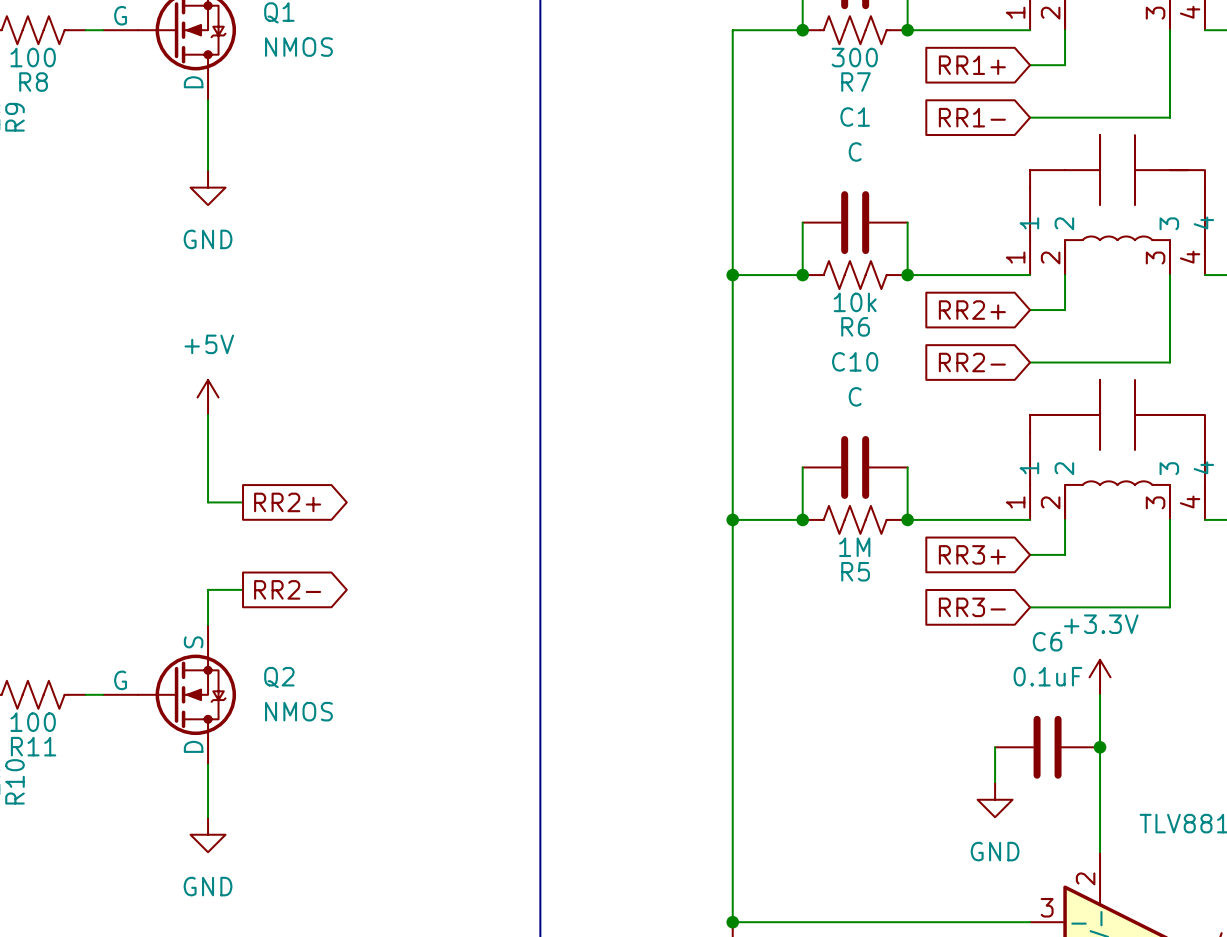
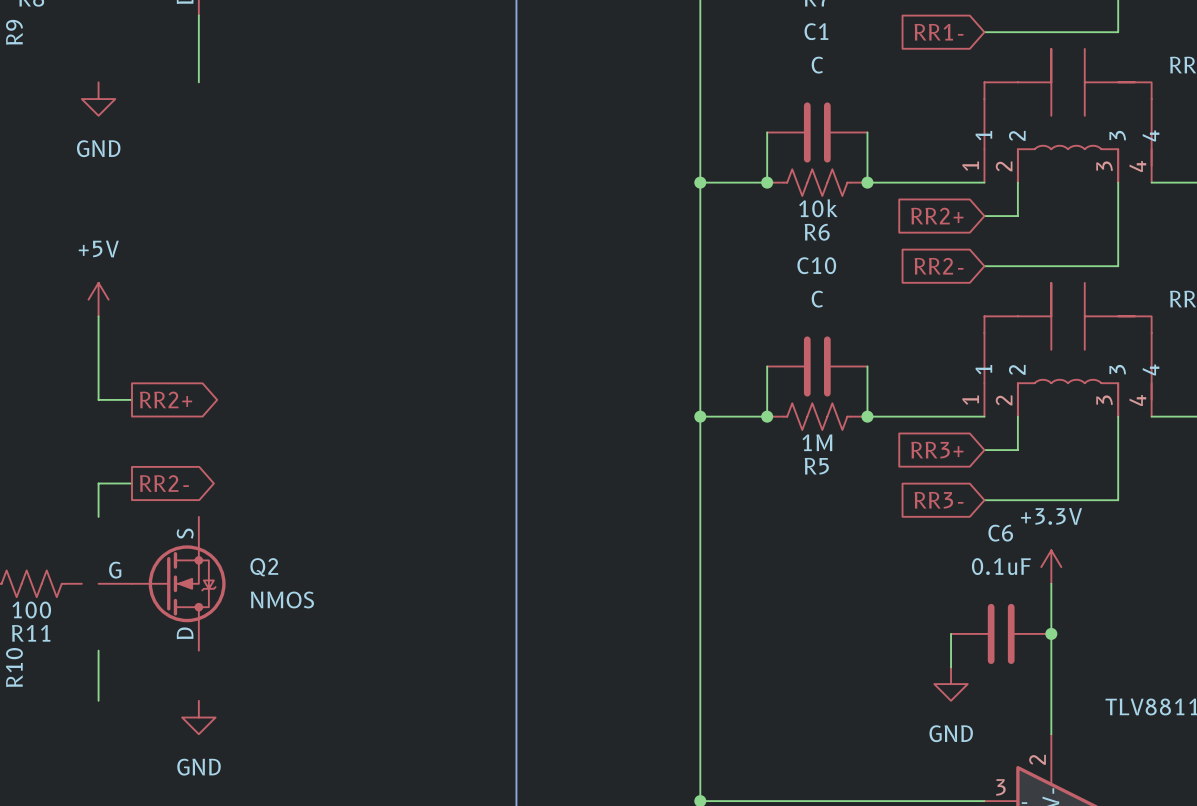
power symbol: none -> GND (98, 99)
power symbol: GND (208, 187) -> none
power symbol position: +5V (208, 397) -> +5V (98, 299)
wire: (208, 414) (208, 502) (243, 502) -> (98, 316) (98, 399) (131, 399)
global label position: RR2+ (287, 502) -> RR2+ (166, 399)
wire: (243, 589) (208, 589) (208, 624) -> (131, 483) (98, 483) (98, 516)
global label position: RR2- (287, 589) -> RR2- (164, 483)
wire: (85, 694) (103, 694) -> none
wire: (208, 764) (208, 817) -> (98, 650) (98, 700)

